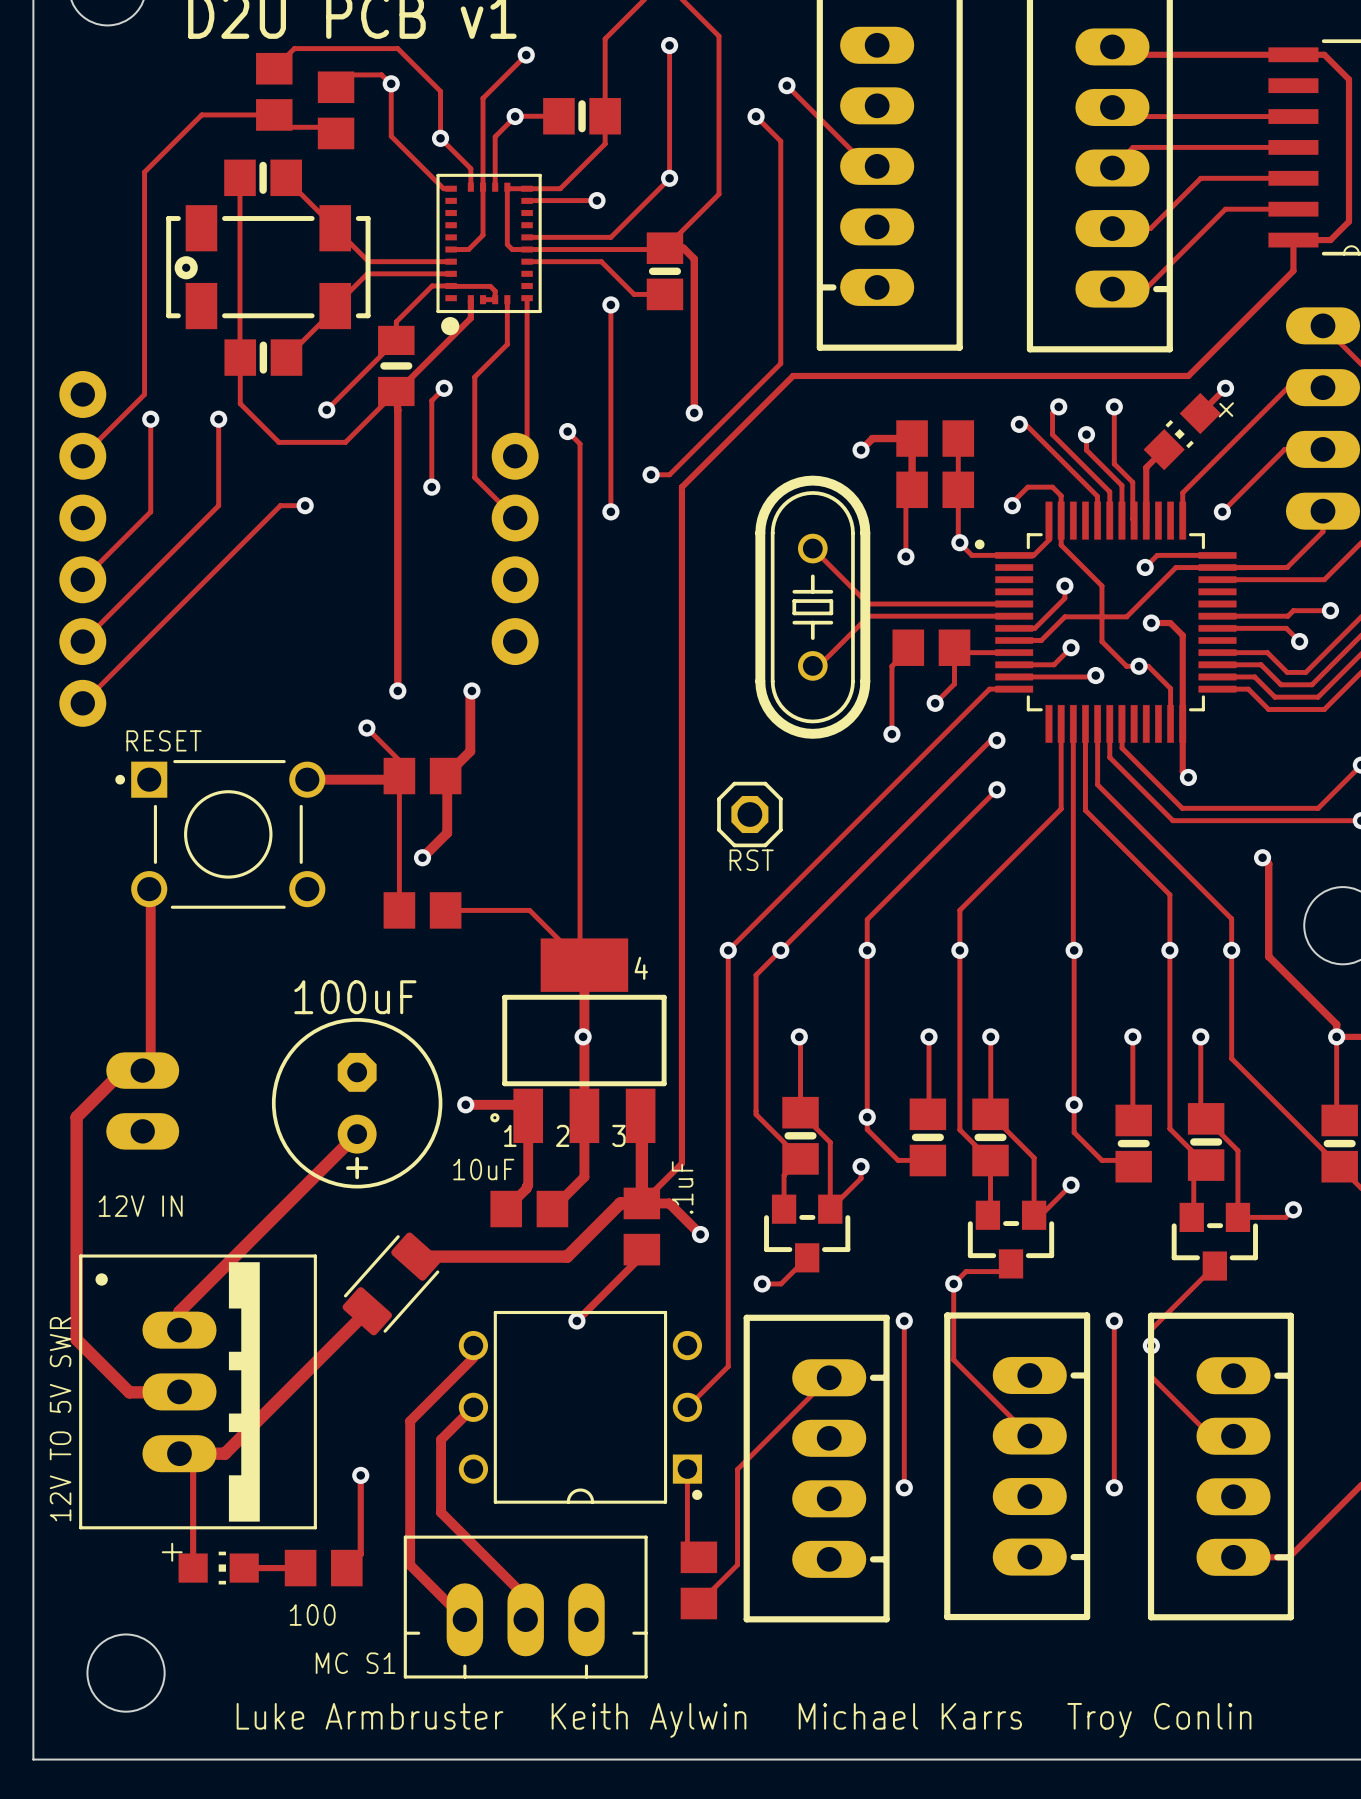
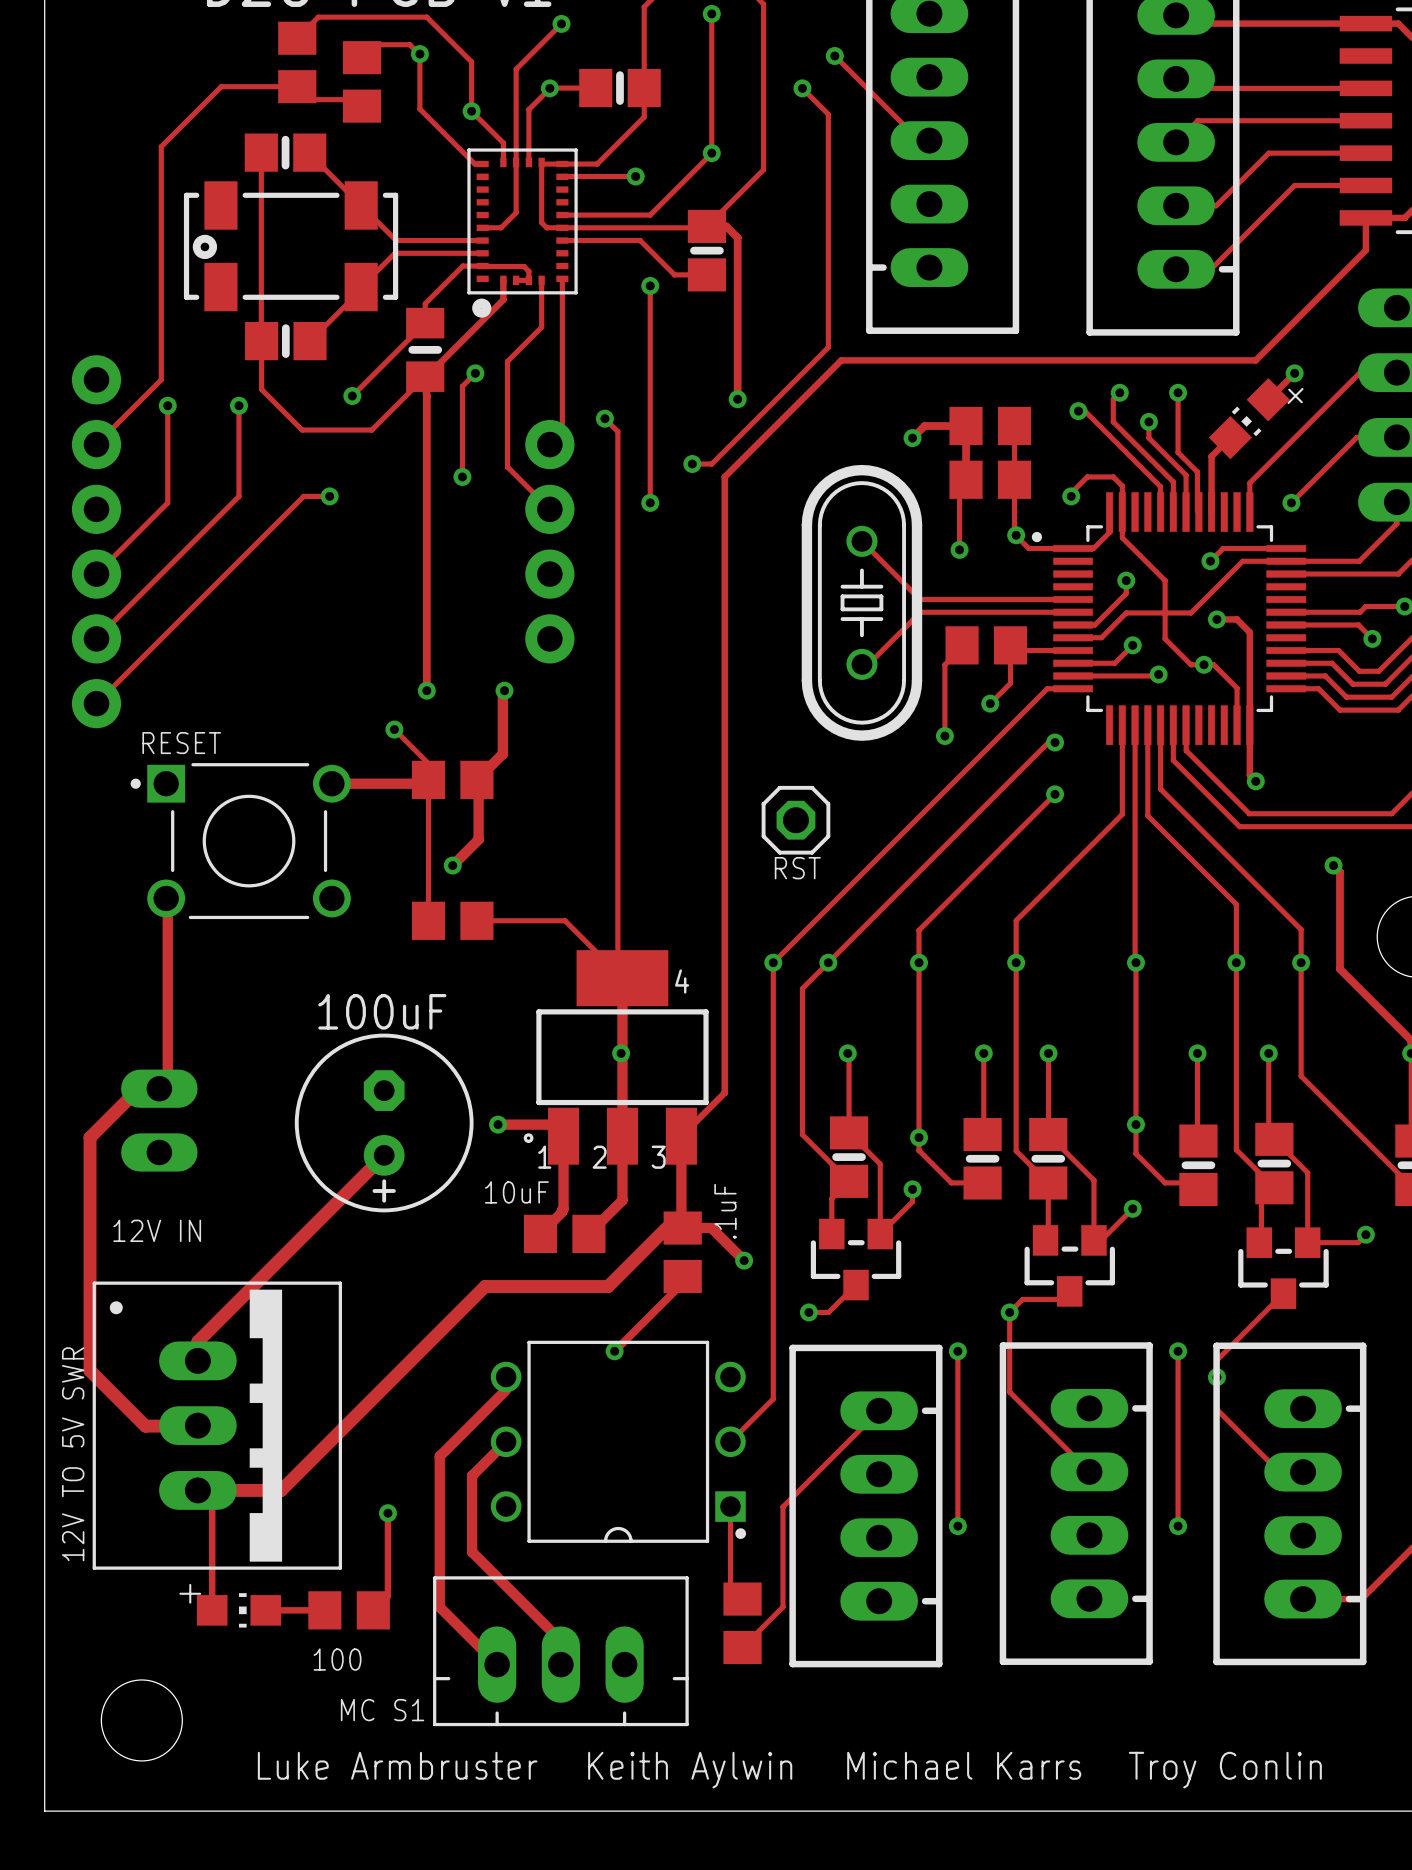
track: (681, 1074) (681, 1163) (641, 1203) (640, 1115) -> (724, 1092) (681, 1136) (682, 1228)
track: (626, 1203) (620, 1203) (567, 1256) (415, 1256) -> (666, 1228) (608, 1286) (485, 1286) (281, 1490) (245, 1490)
part: (391, 1283) -> none
track: (367, 1311) (224, 1453) -> none

